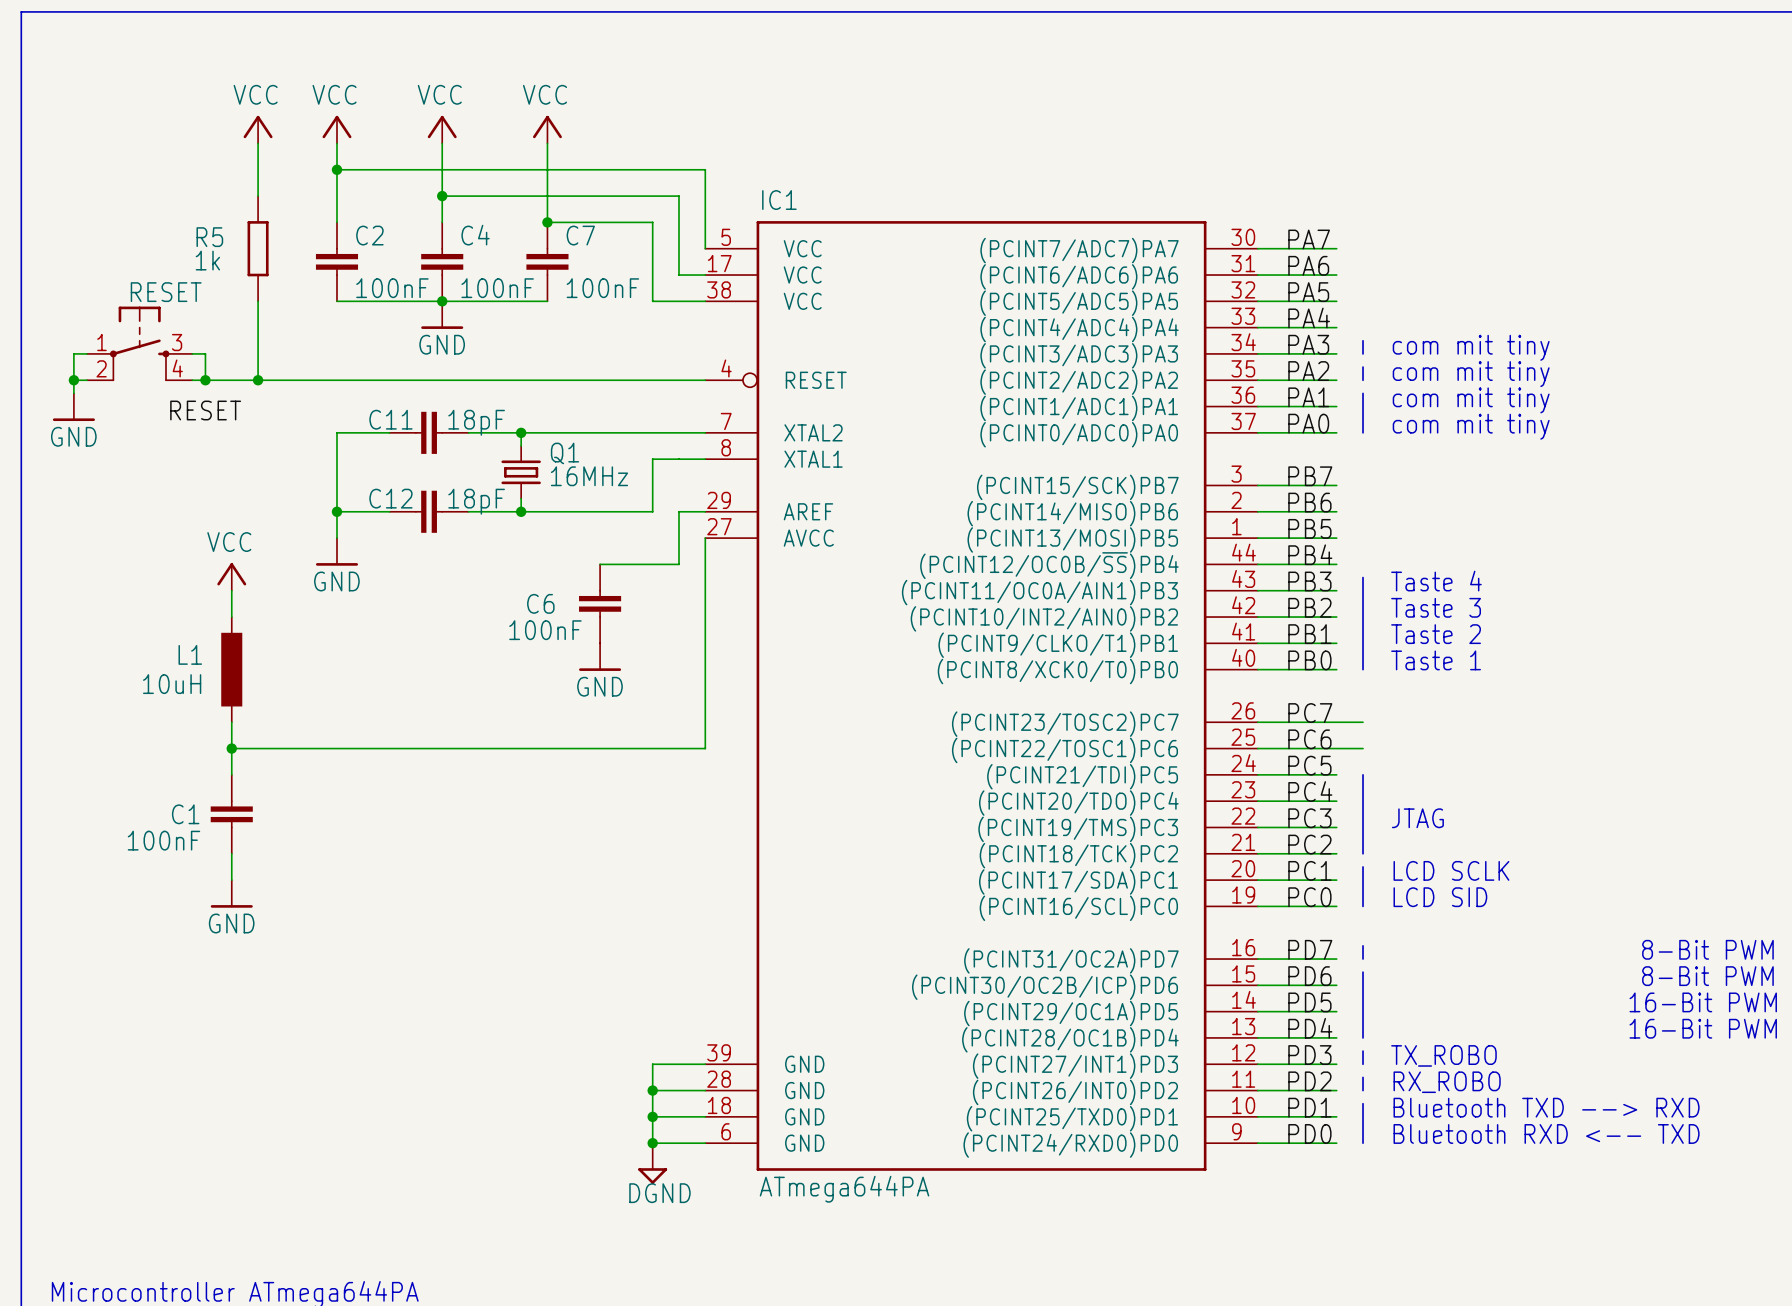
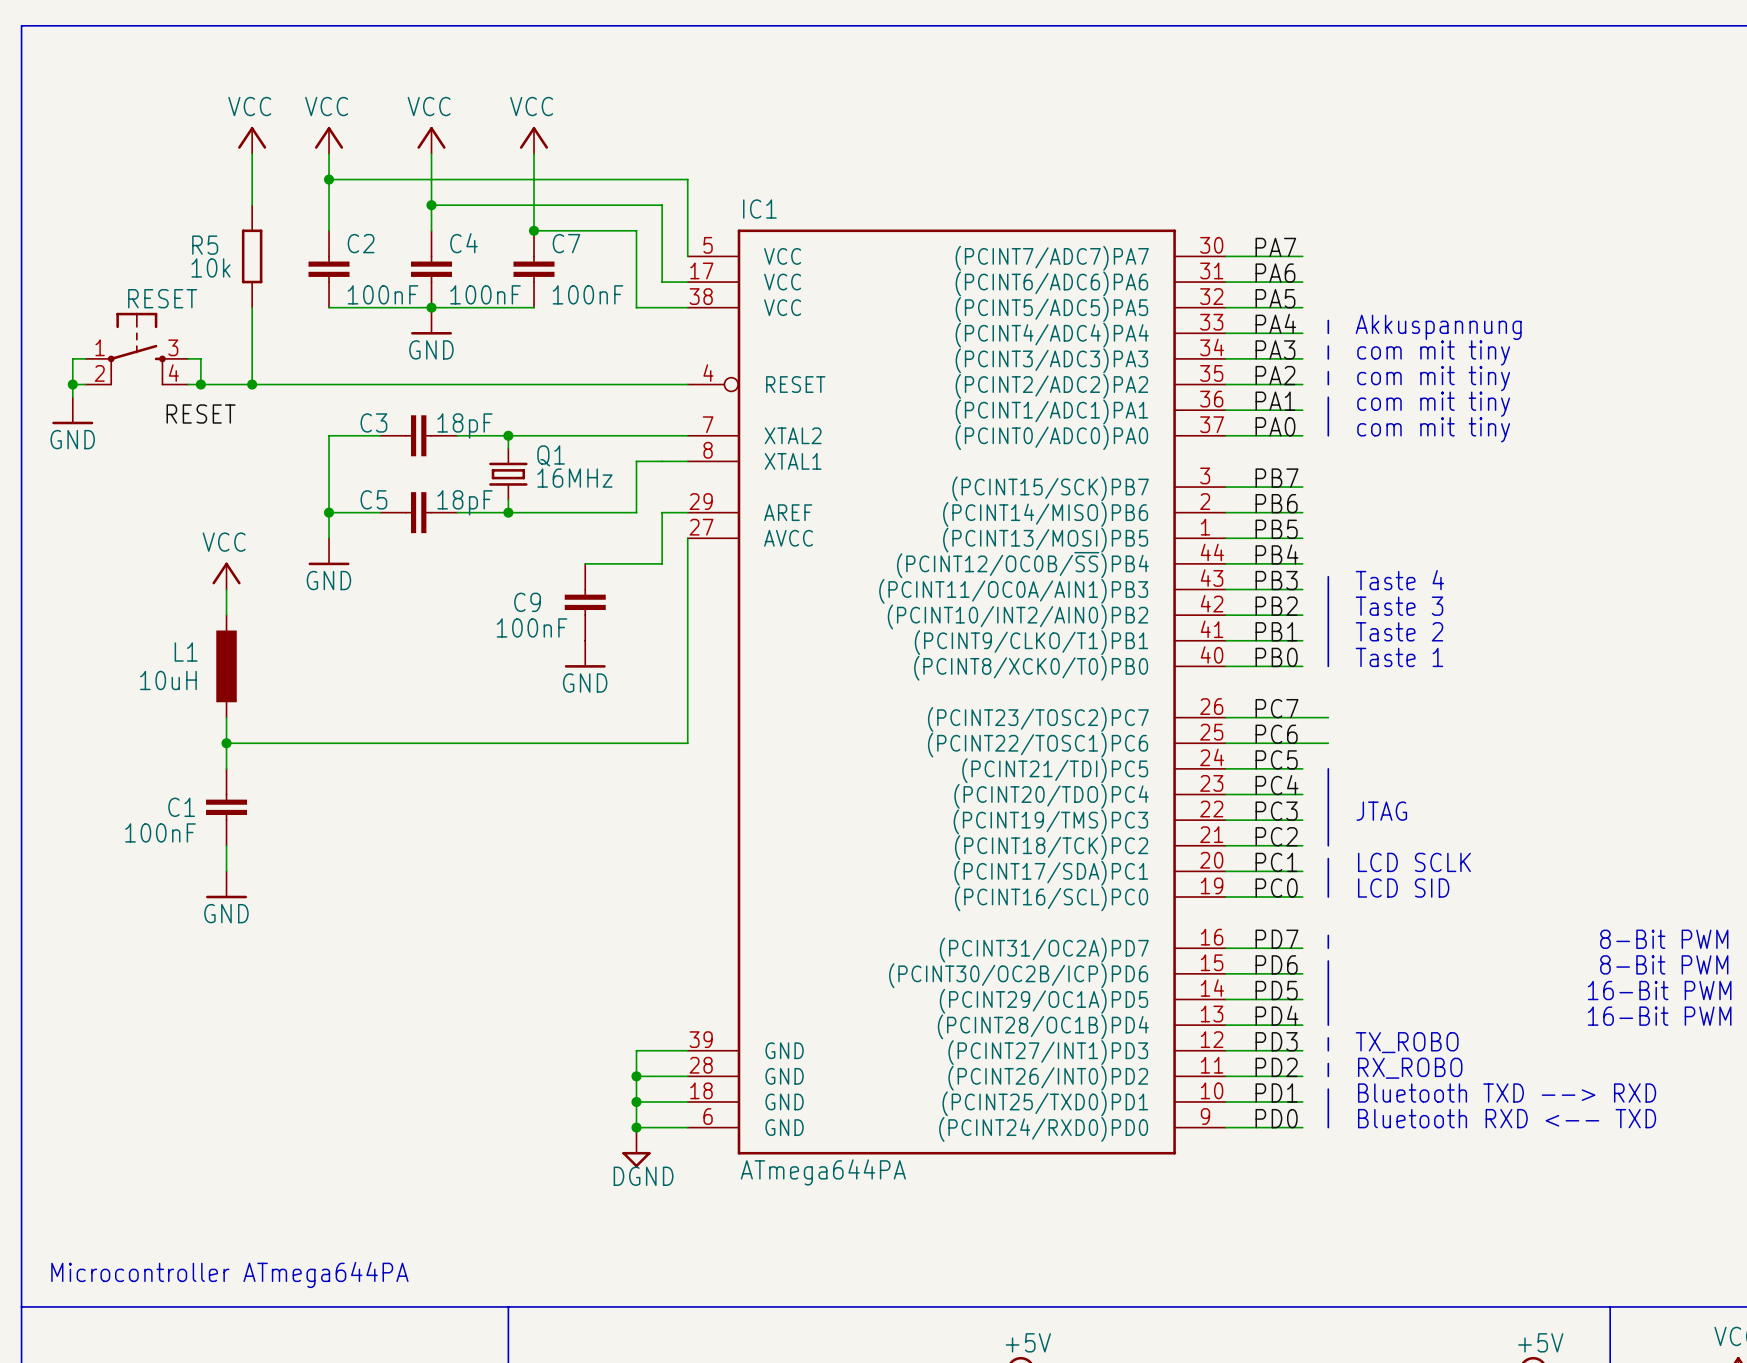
R5 value: 1k (207, 260) -> 10k (210, 267)
line: none -> (1328, 320) (1328, 333)
text: none -> Akkuspannung (1438, 327)
C11 name: C11 (390, 419) -> C3 (373, 422)
C12 name: C12 (390, 498) -> C5 (373, 499)
C6 name: C6 (540, 603) -> C9 (527, 602)

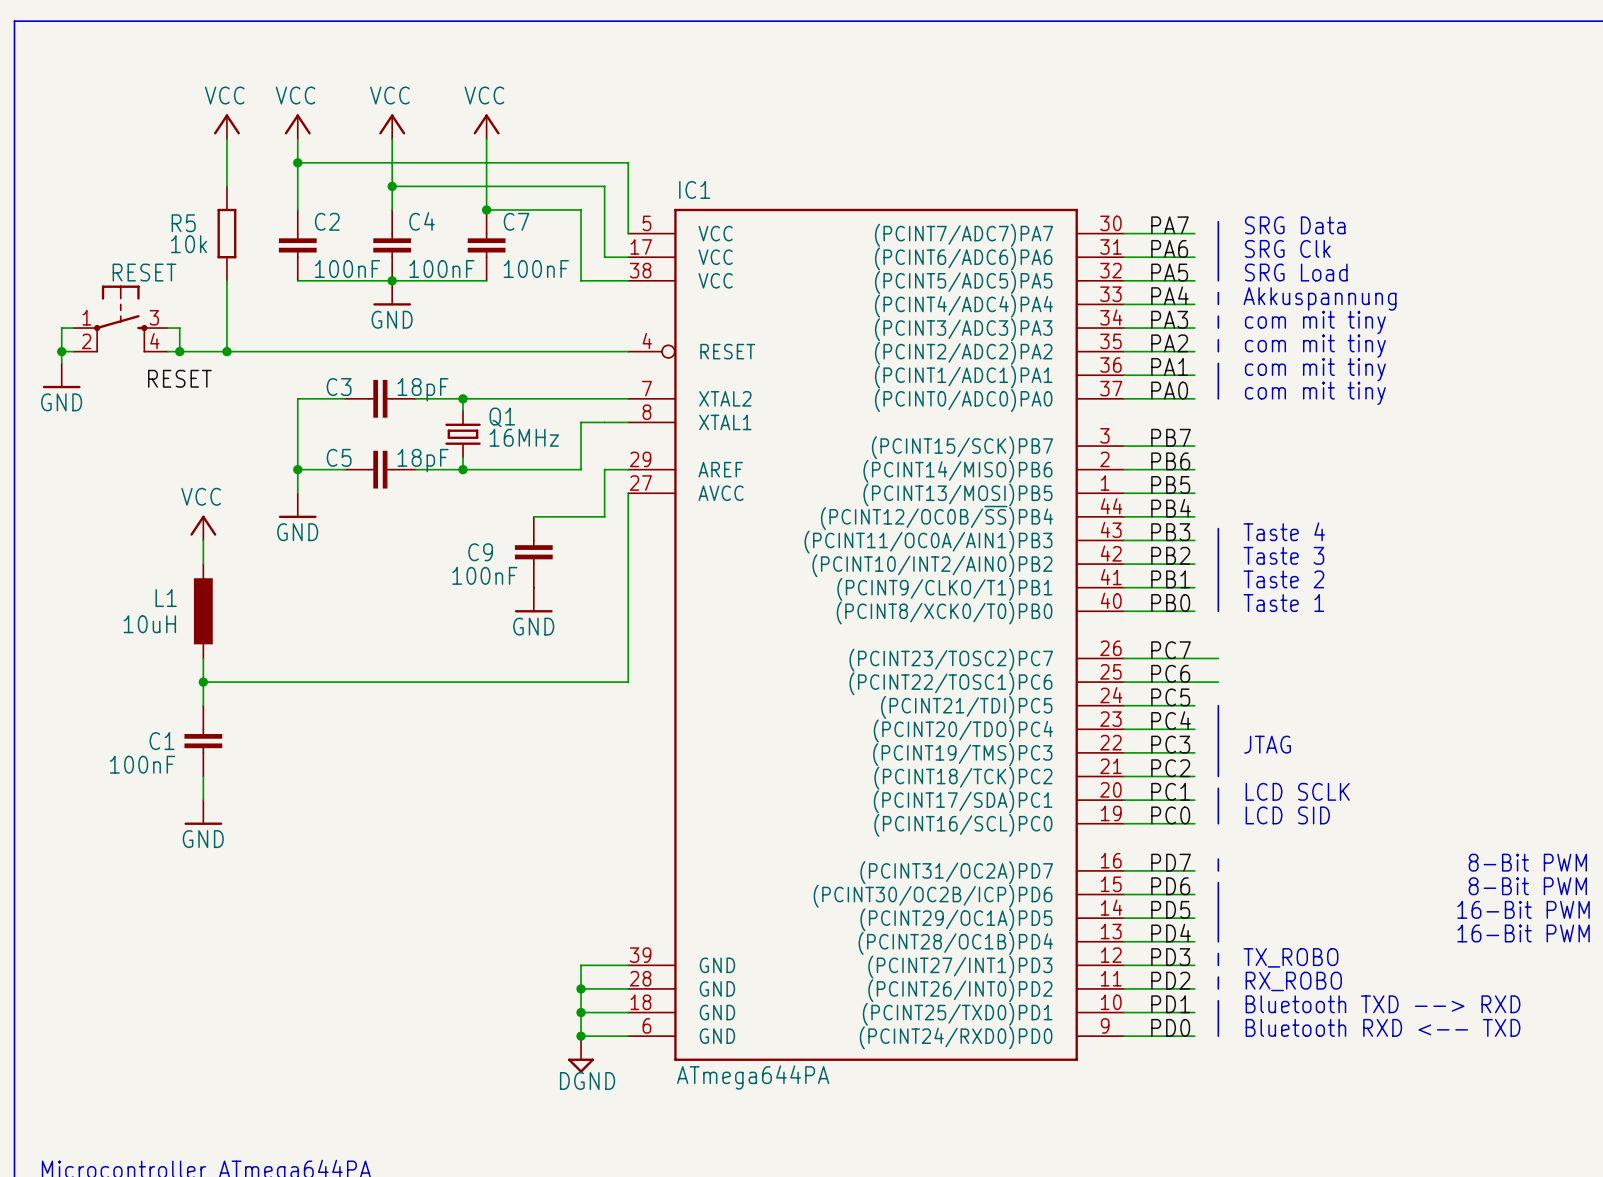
line: none -> (1218, 221) (1218, 280)
text: none -> SRG Data (1295, 225)
text: none -> SRG Clk (1287, 248)
text: none -> SRG Load (1296, 272)

